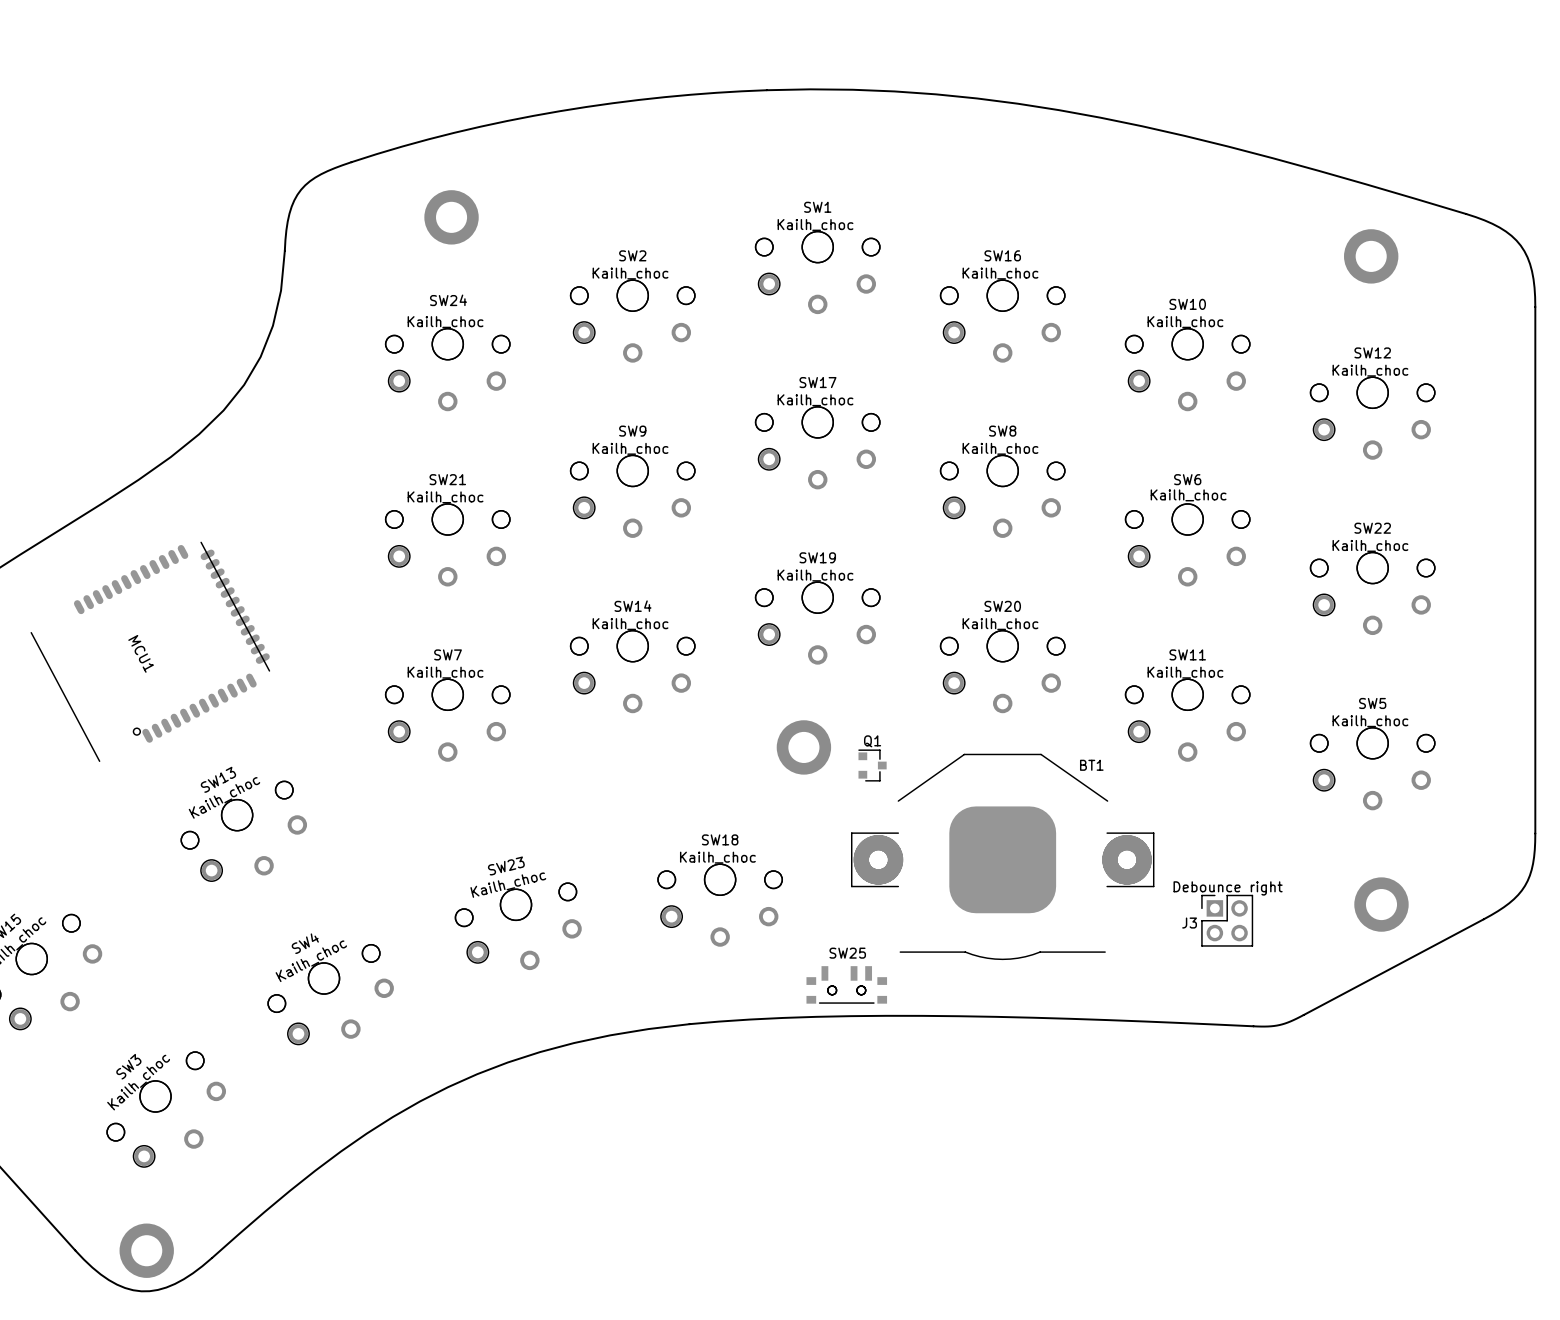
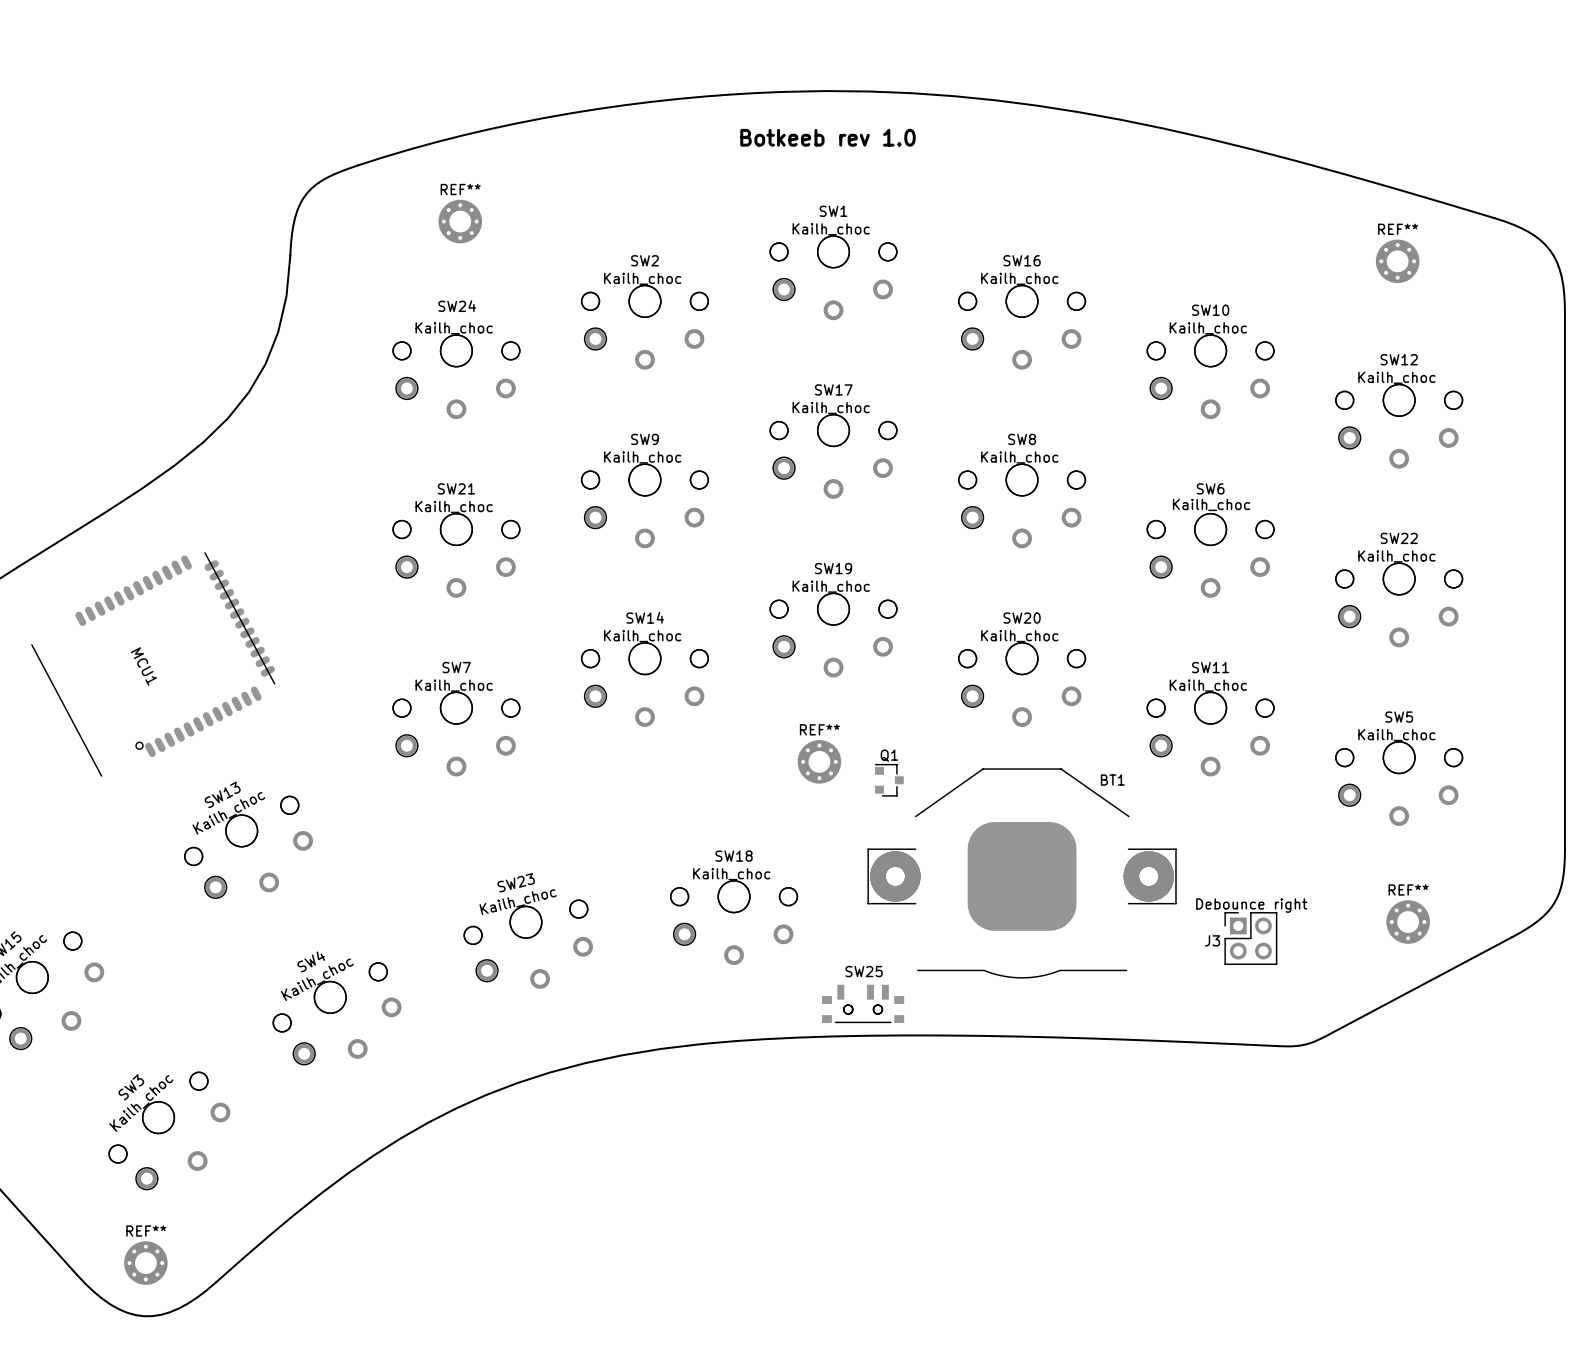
text: none -> Botkeeb rev 1.0 (828, 137)
part: (451, 217) -> none
REF**: none -> (460, 221)
part: (1371, 256) -> none
REF**: none -> (1397, 261)
part: (803, 747) -> none
REF**: none -> (819, 761)
part: (1381, 904) -> none
REF**: none -> (1408, 922)
REF**: none -> (145, 1263)
part: (146, 1250) -> none

